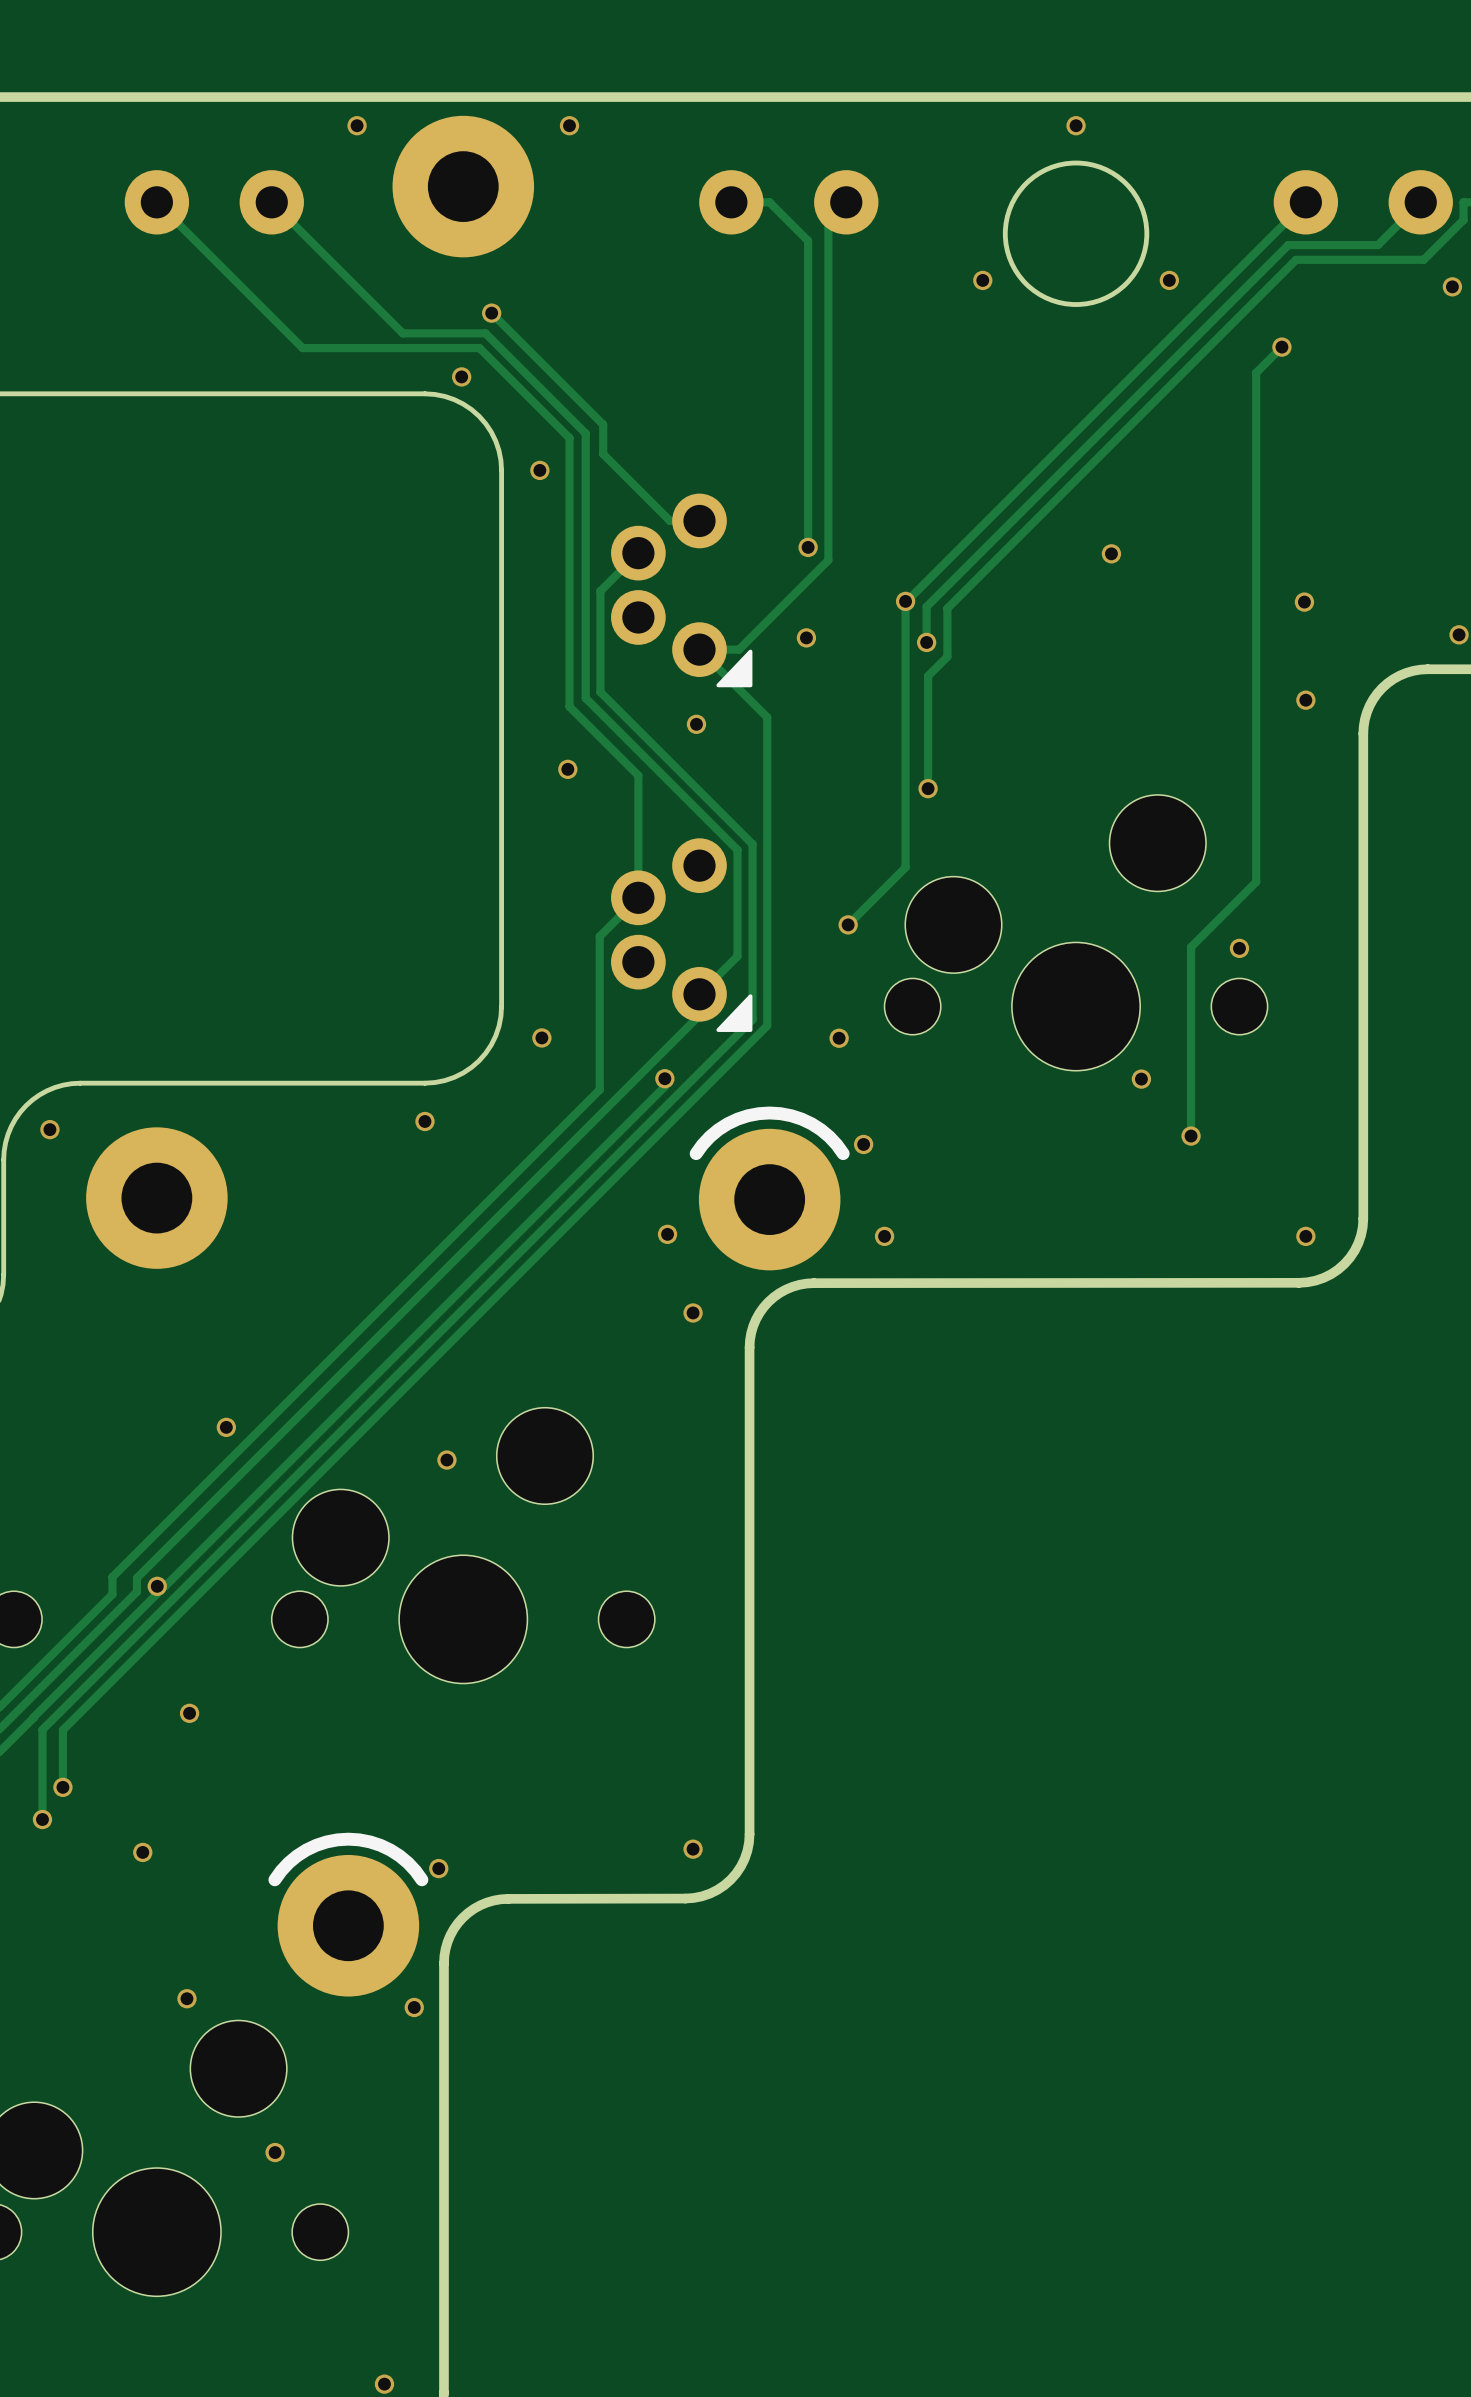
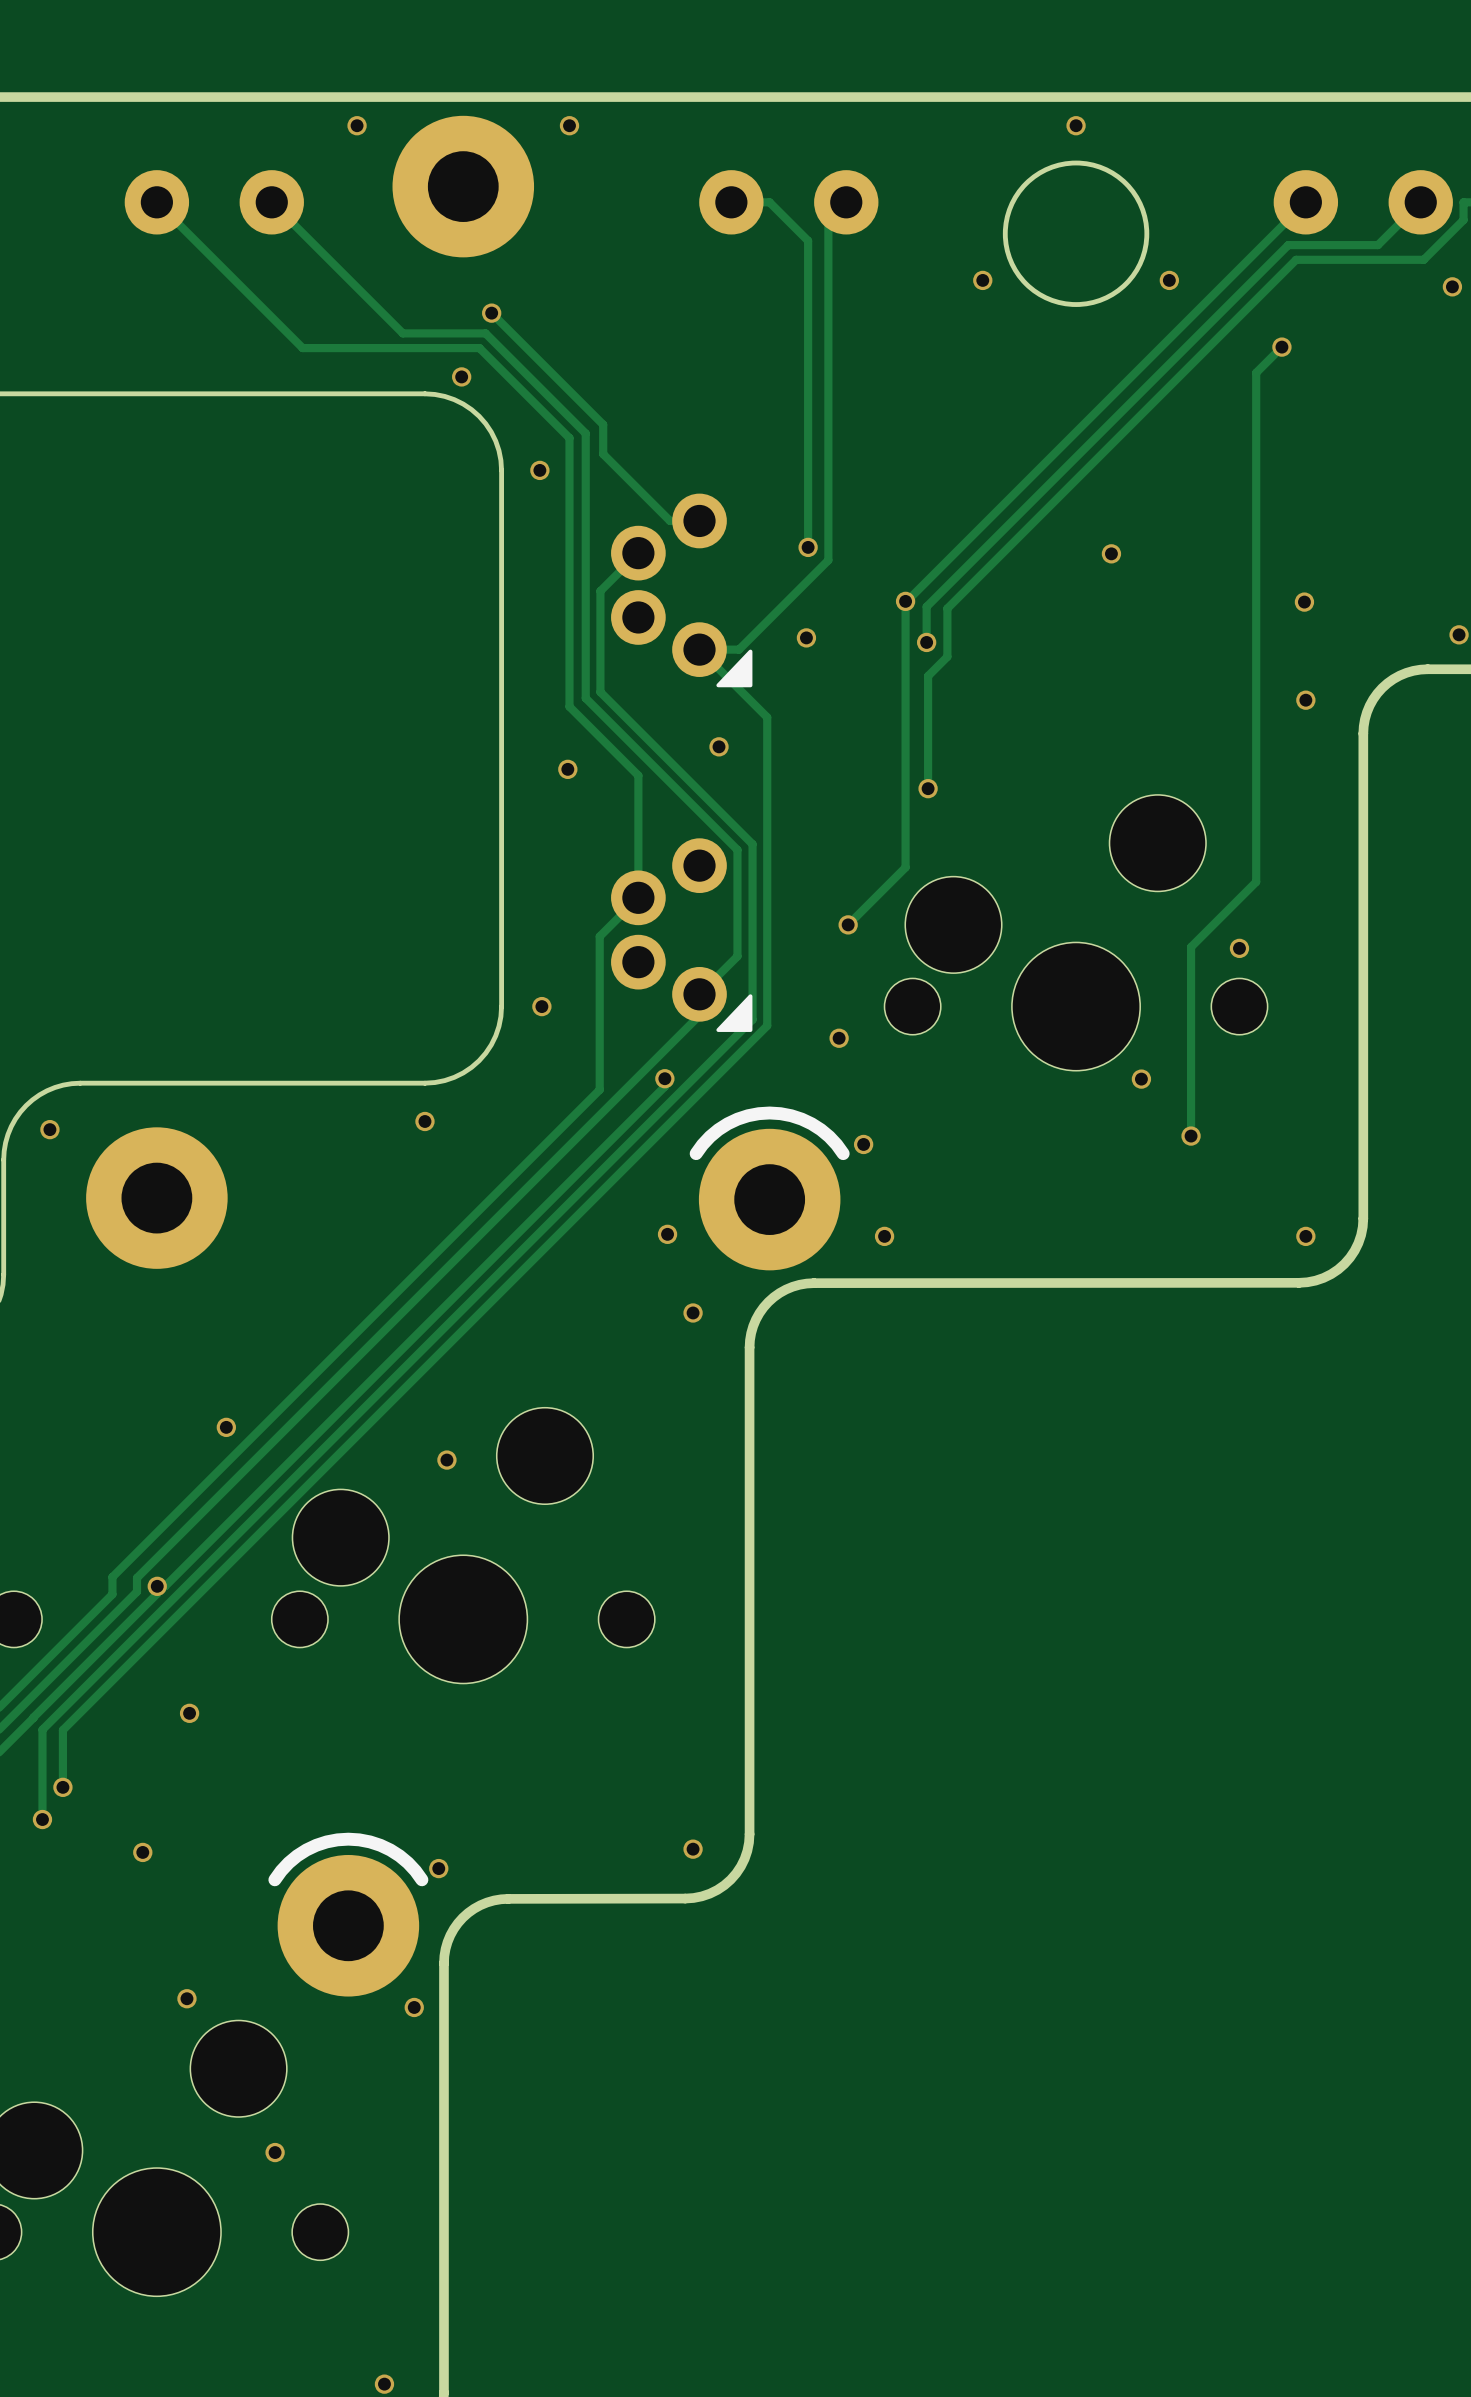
via position: (696, 724) -> (719, 746)
via position: (541, 1037) -> (541, 1006)

